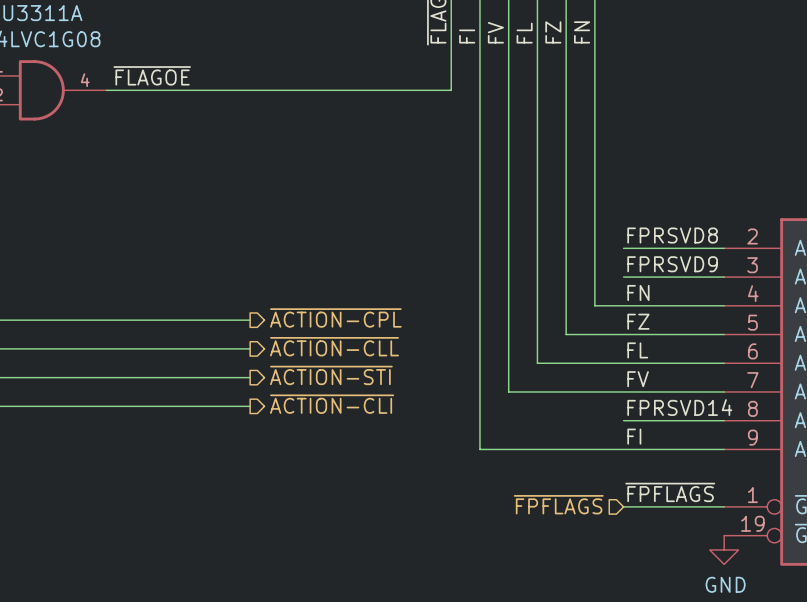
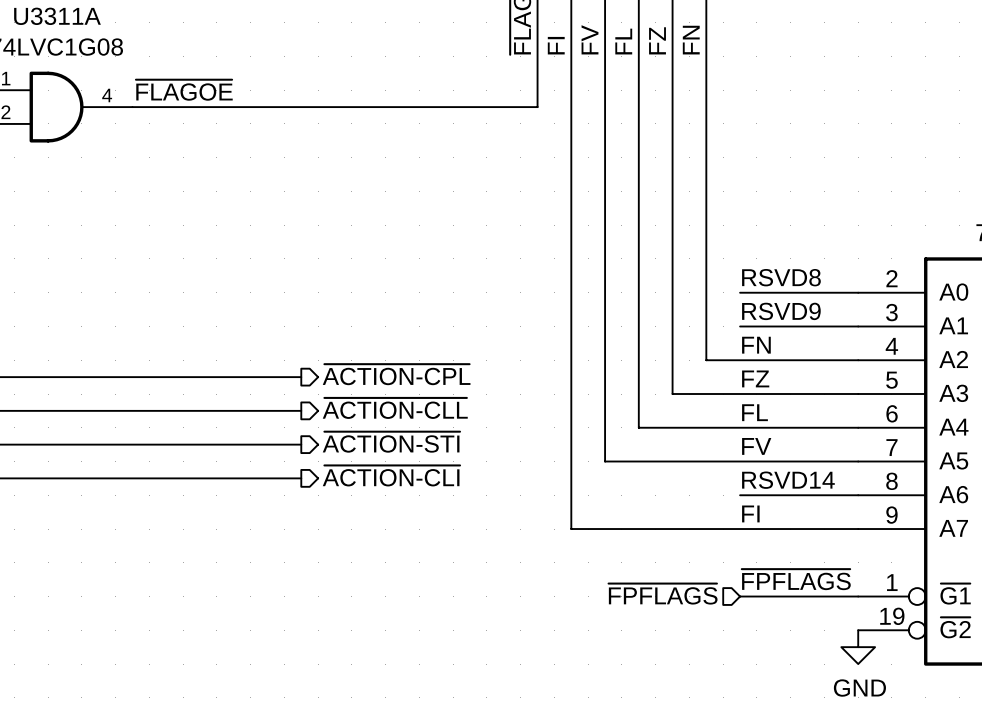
label: FPRSVD8 (672, 235) -> RSVD8 (781, 277)
label: FPRSVD9 (672, 264) -> RSVD9 (781, 311)
label: FPRSVD14 (679, 407) -> RSVD14 (788, 480)

